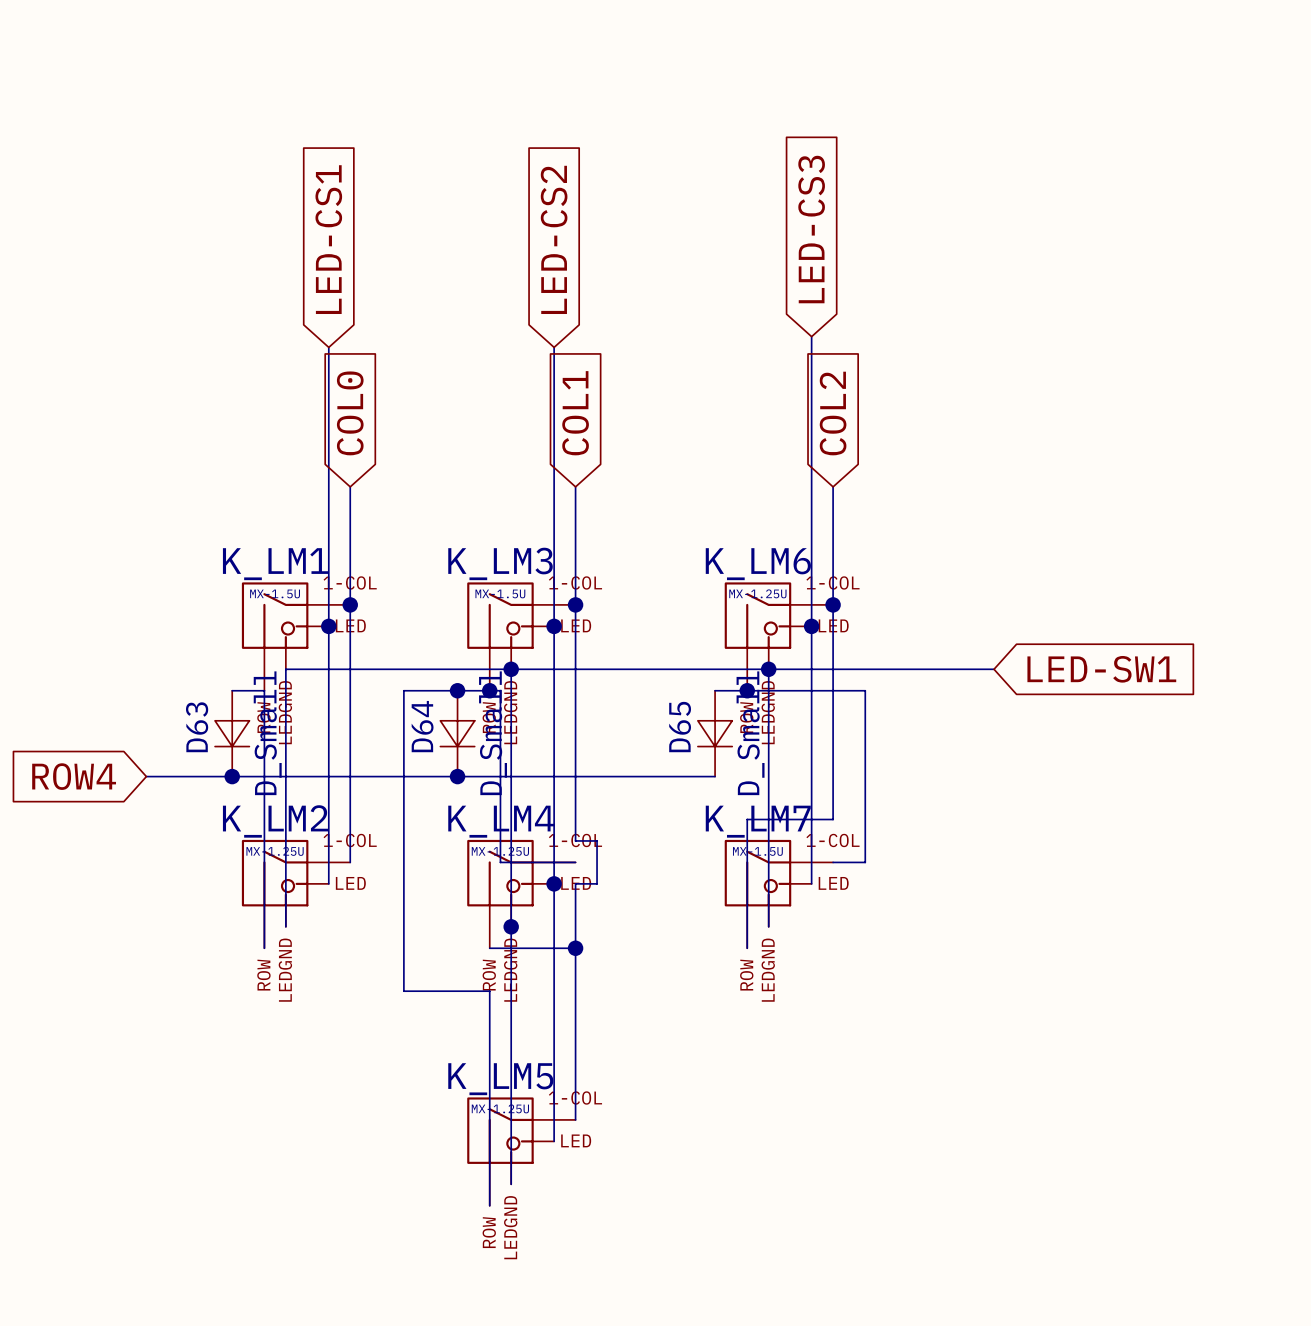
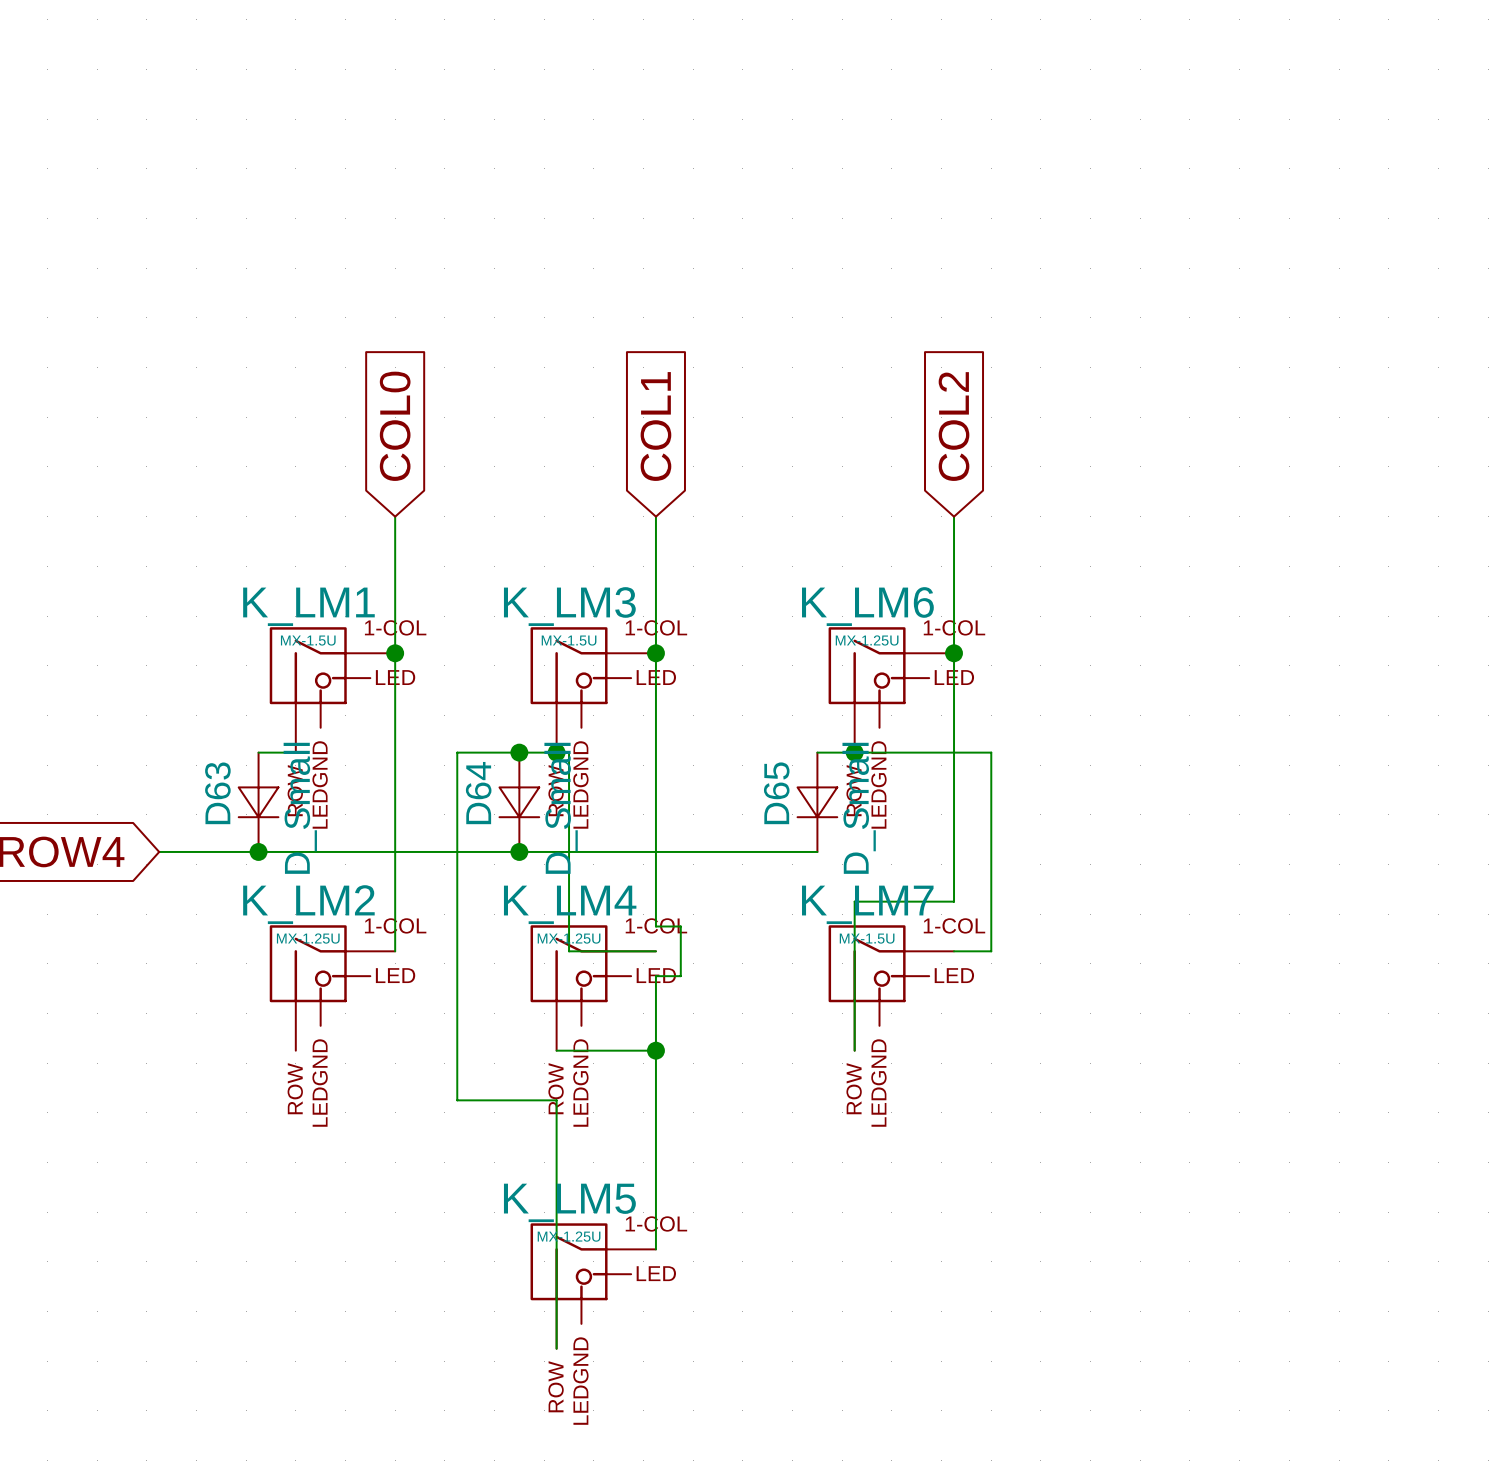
global label: LED-CS3 (811, 229) -> none
global label: LED-CS1 (328, 239) -> none
global label: LED-CS2 (554, 239) -> none
wire: (811, 336) (811, 883) -> none
wire: (328, 347) (328, 883) -> none
wire: (554, 347) (554, 1141) -> none
junction: (328, 626) -> none
junction: (554, 626) -> none
junction: (811, 626) -> none
wire: (511, 669) (511, 1184) -> none
junction: (511, 669) -> none
wire: (768, 669) (768, 926) -> none
junction: (768, 669) -> none
wire: (994, 669) (285, 669) (285, 926) -> none
global label: LED-SW1 (1101, 669) -> none
wire: (264, 690) (264, 948) -> none
junction: (554, 883) -> none
junction: (511, 926) -> none

